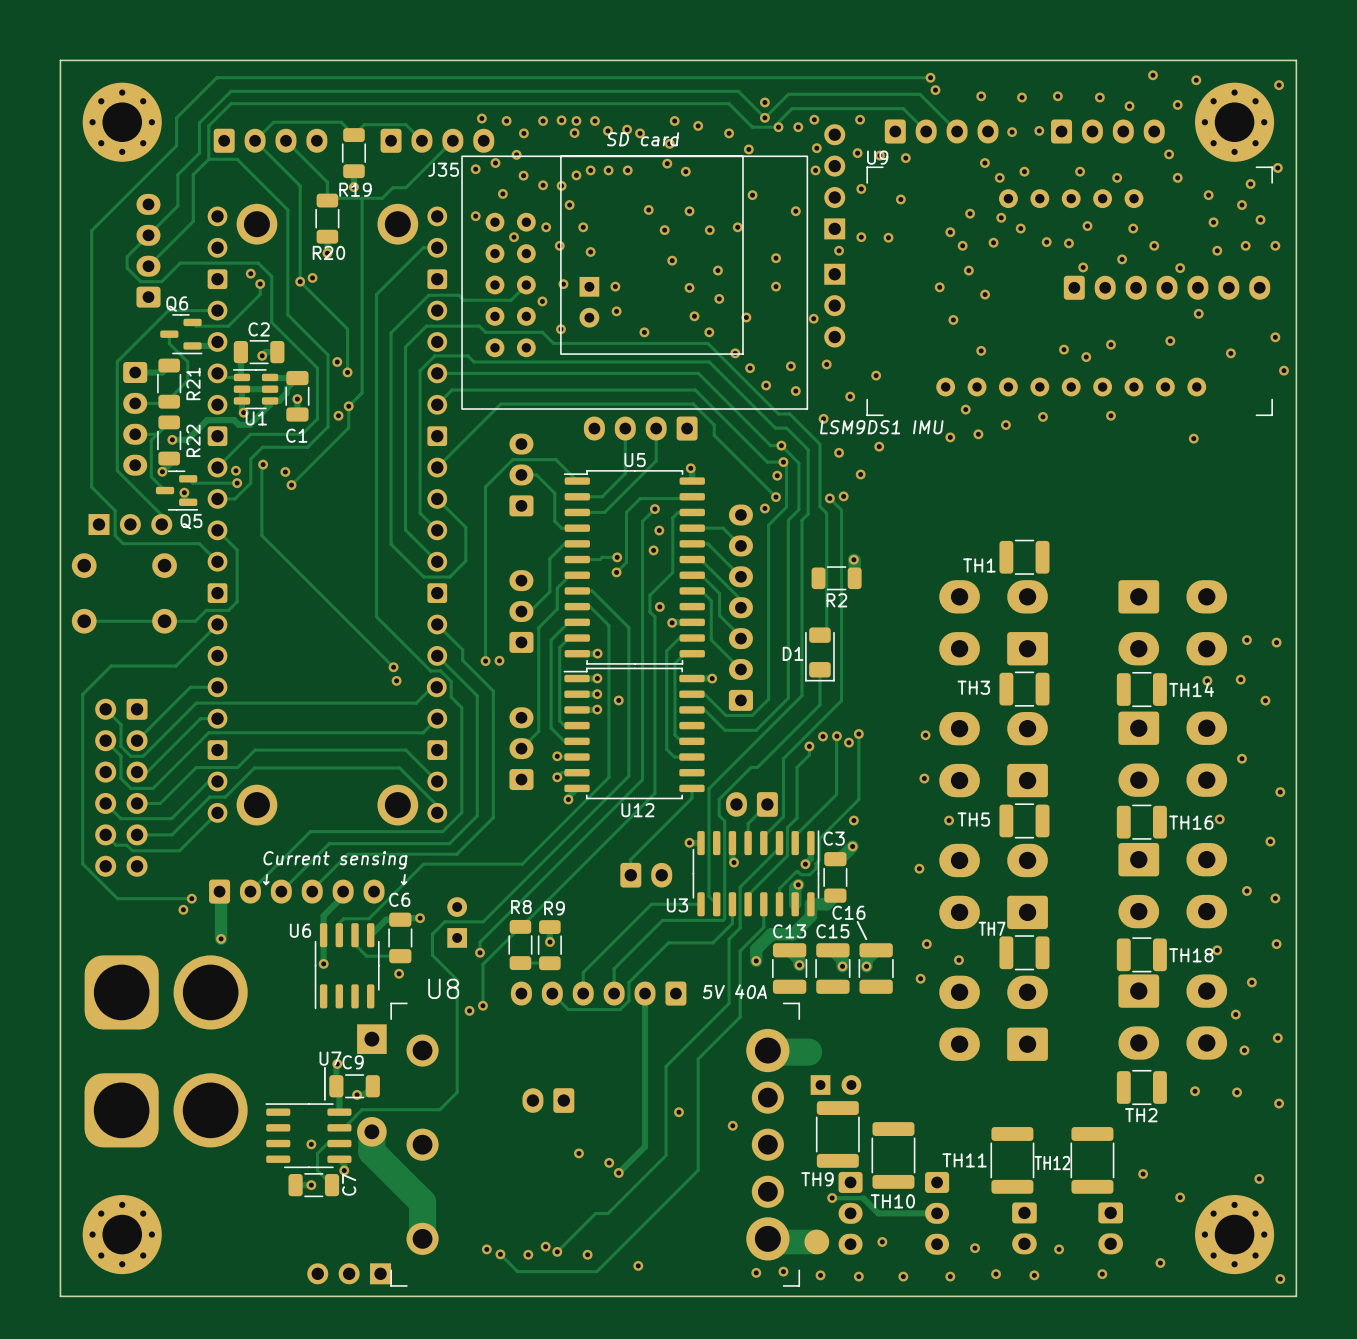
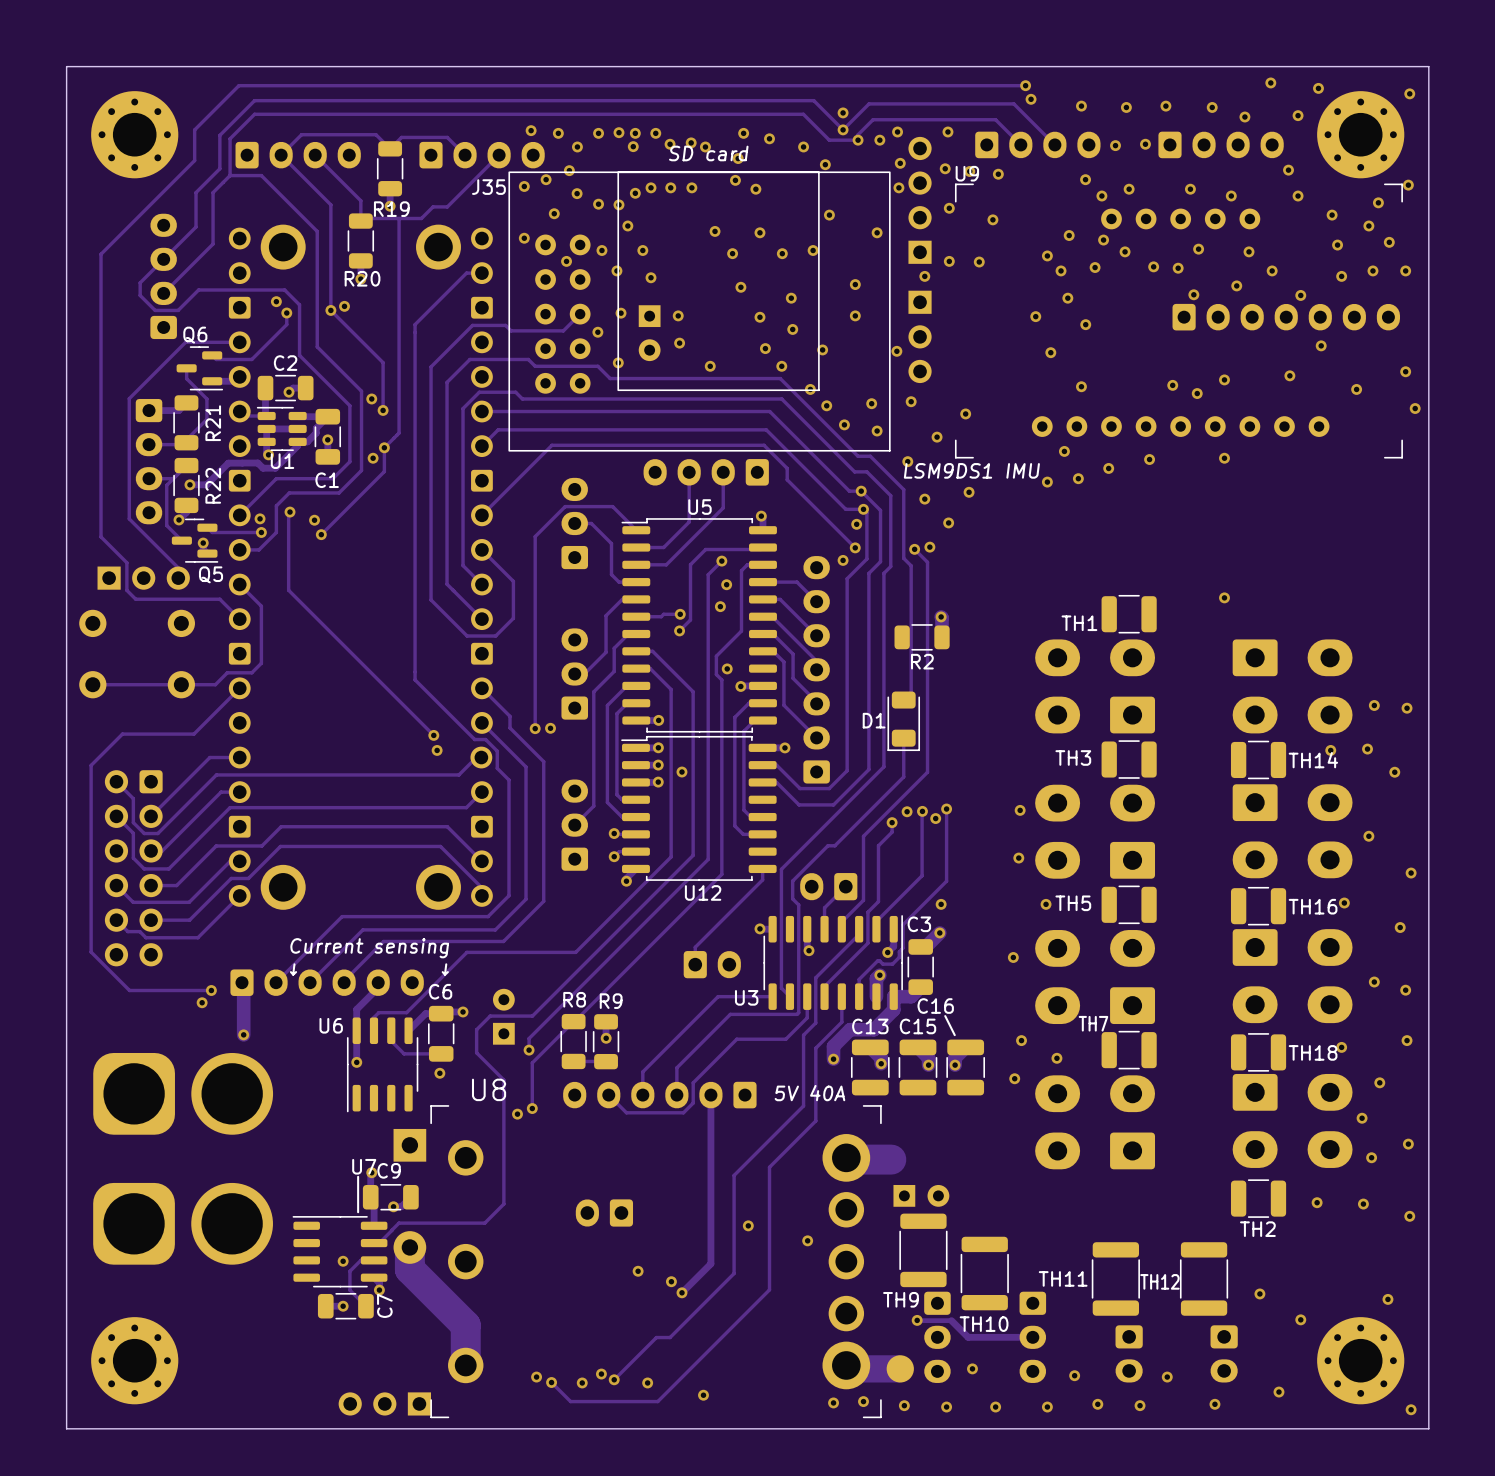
via: (1193, 438) -> none
via: none -> (1224, 597)

